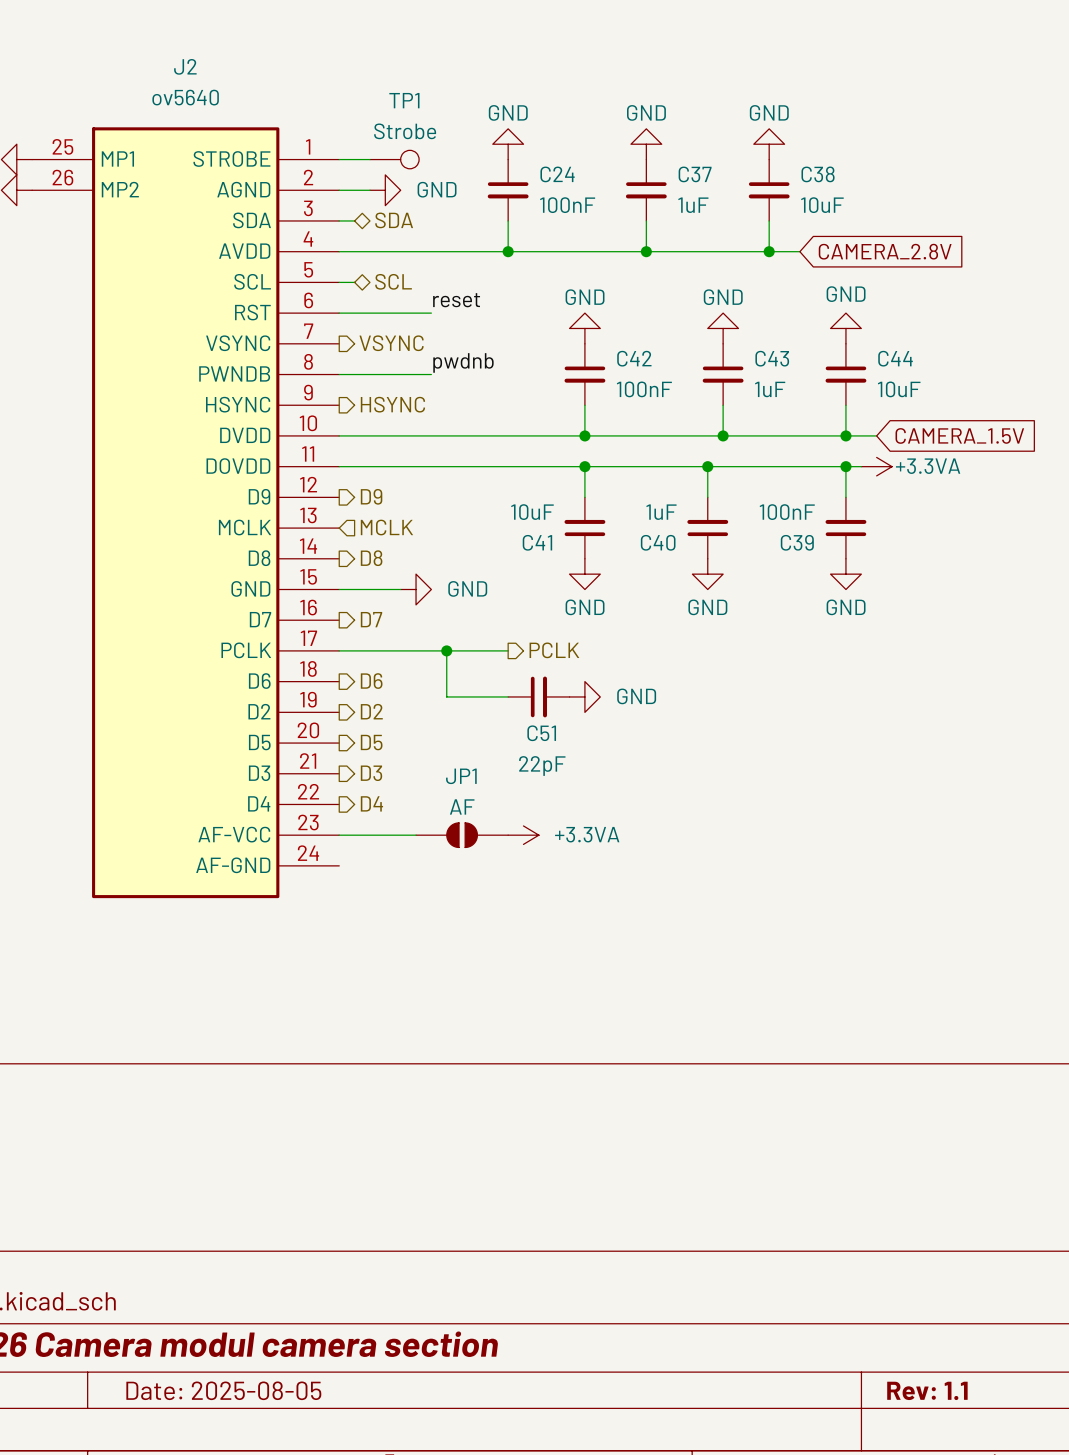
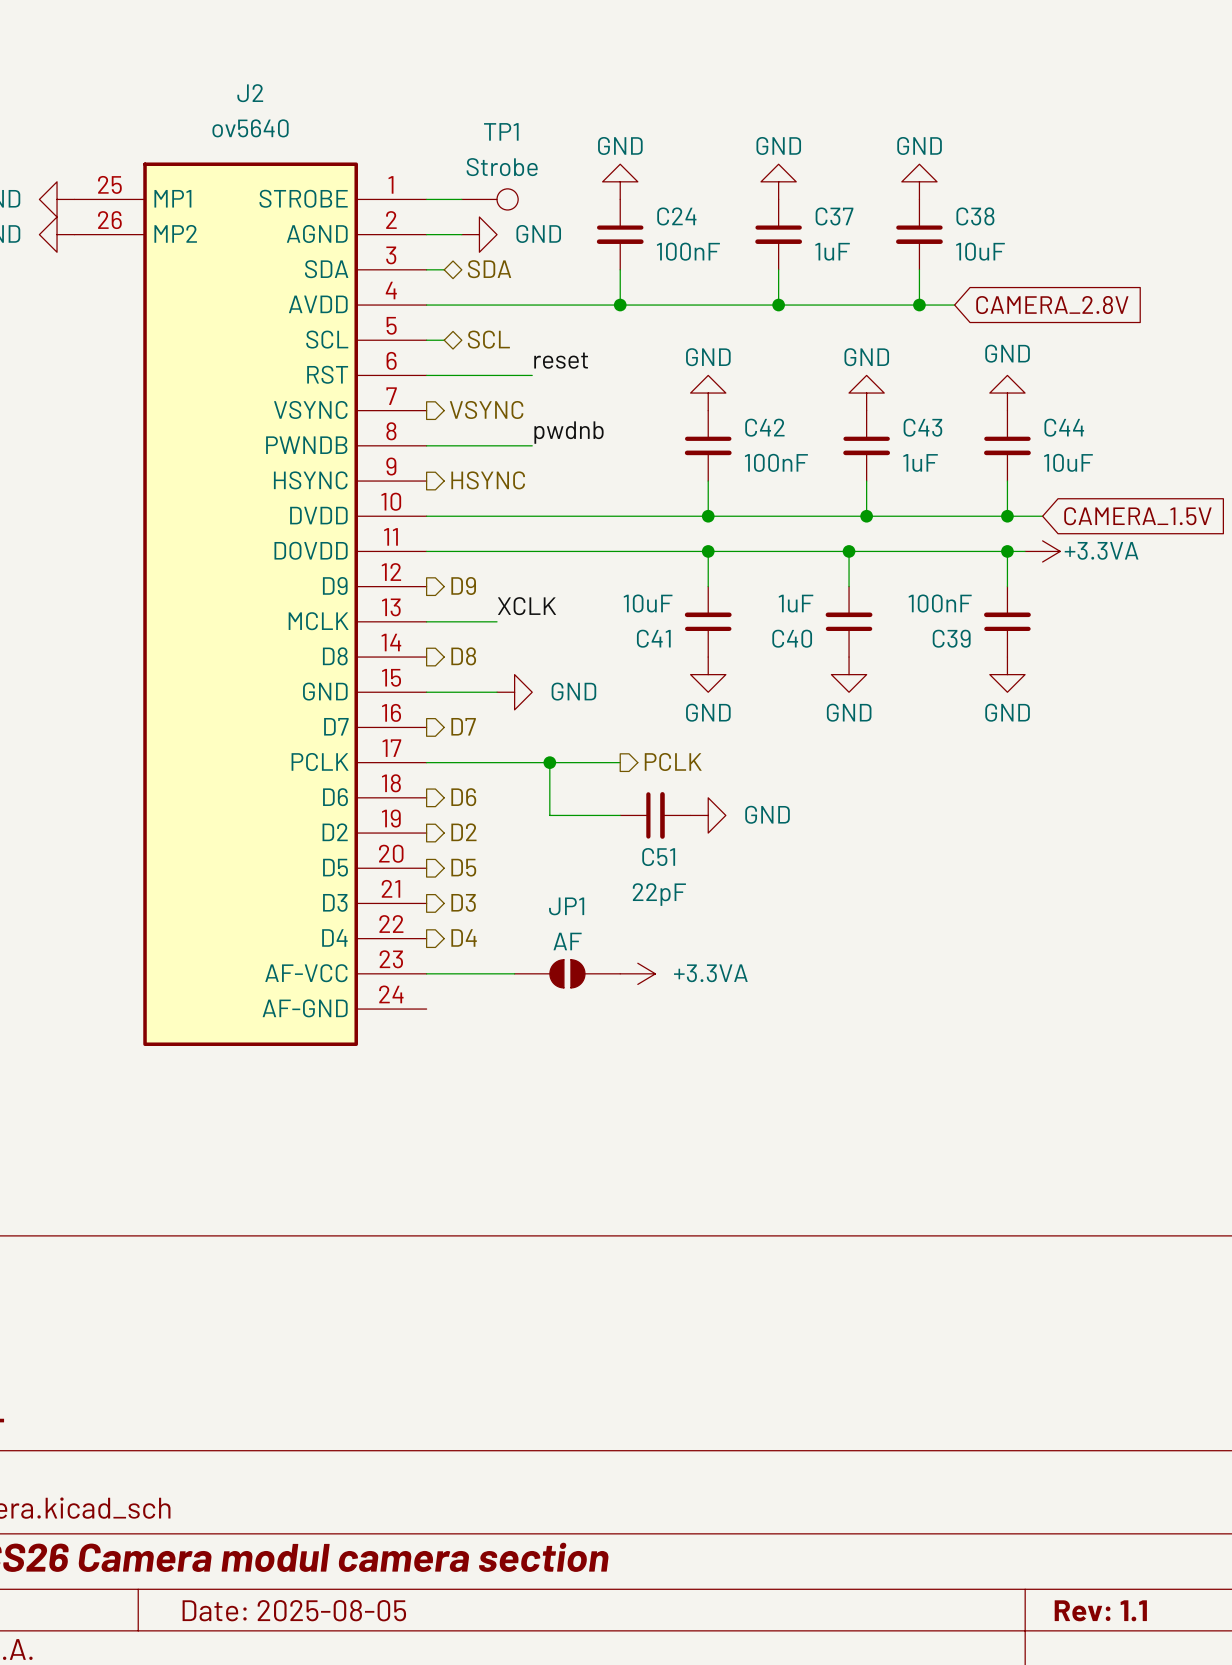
label: none -> XCLK (527, 606)
hierarchical label: MCLK (386, 527) -> none
wire: none -> (426, 621) (497, 621)

